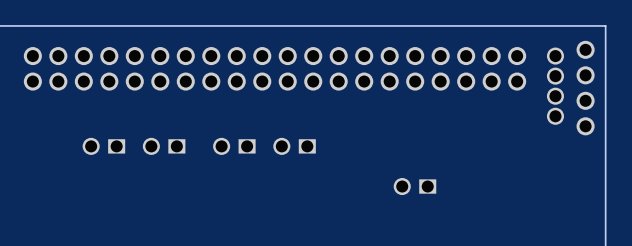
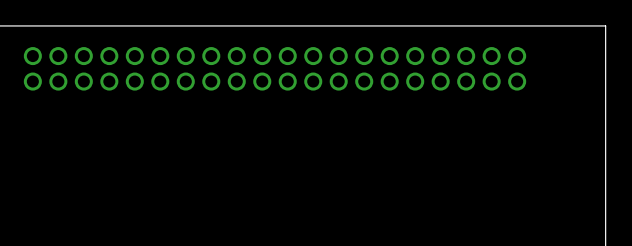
part: (555, 86) -> none
part: (585, 88) -> none
part: (103, 146) -> none
part: (164, 146) -> none
part: (234, 146) -> none
part: (294, 146) -> none
part: (414, 186) -> none

